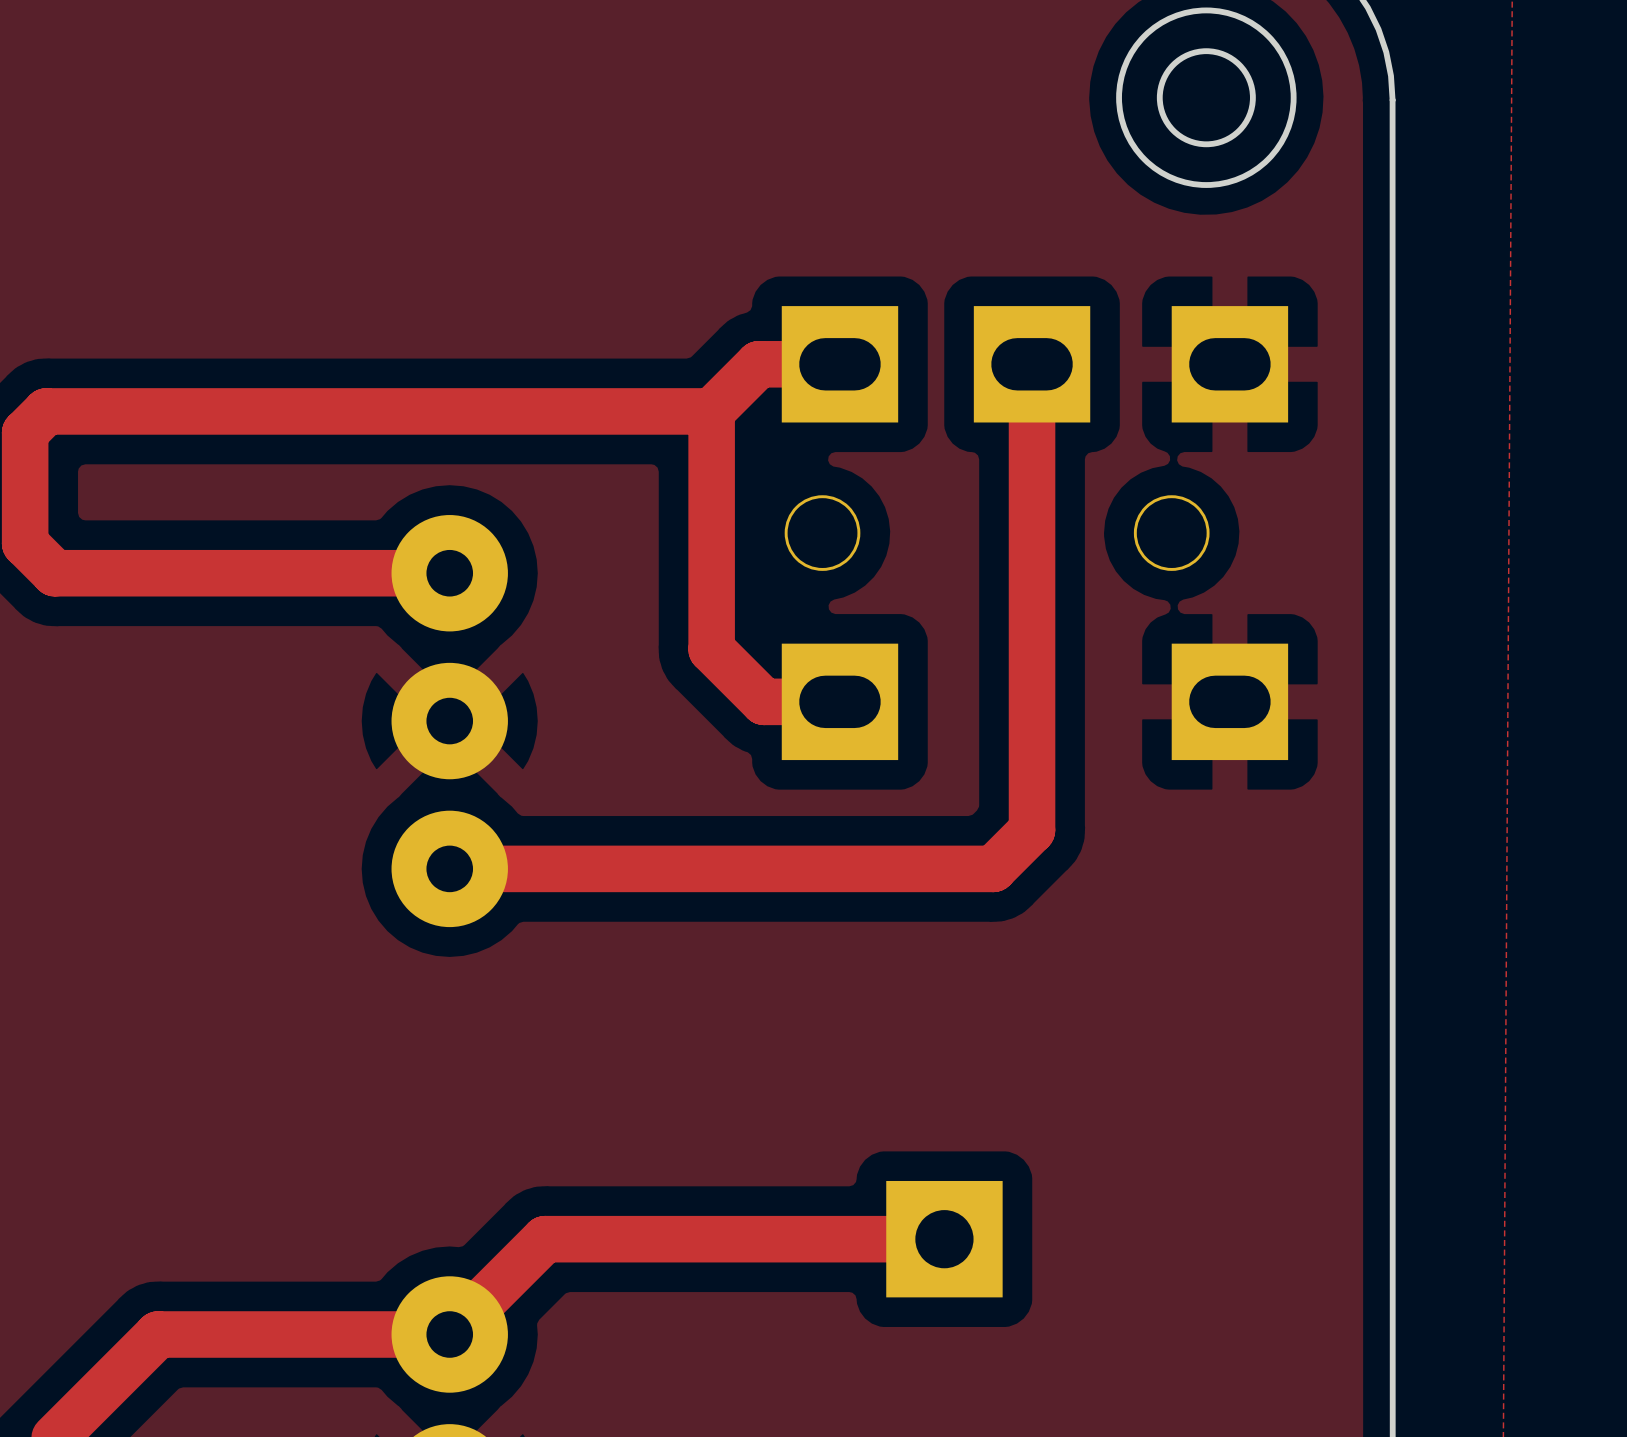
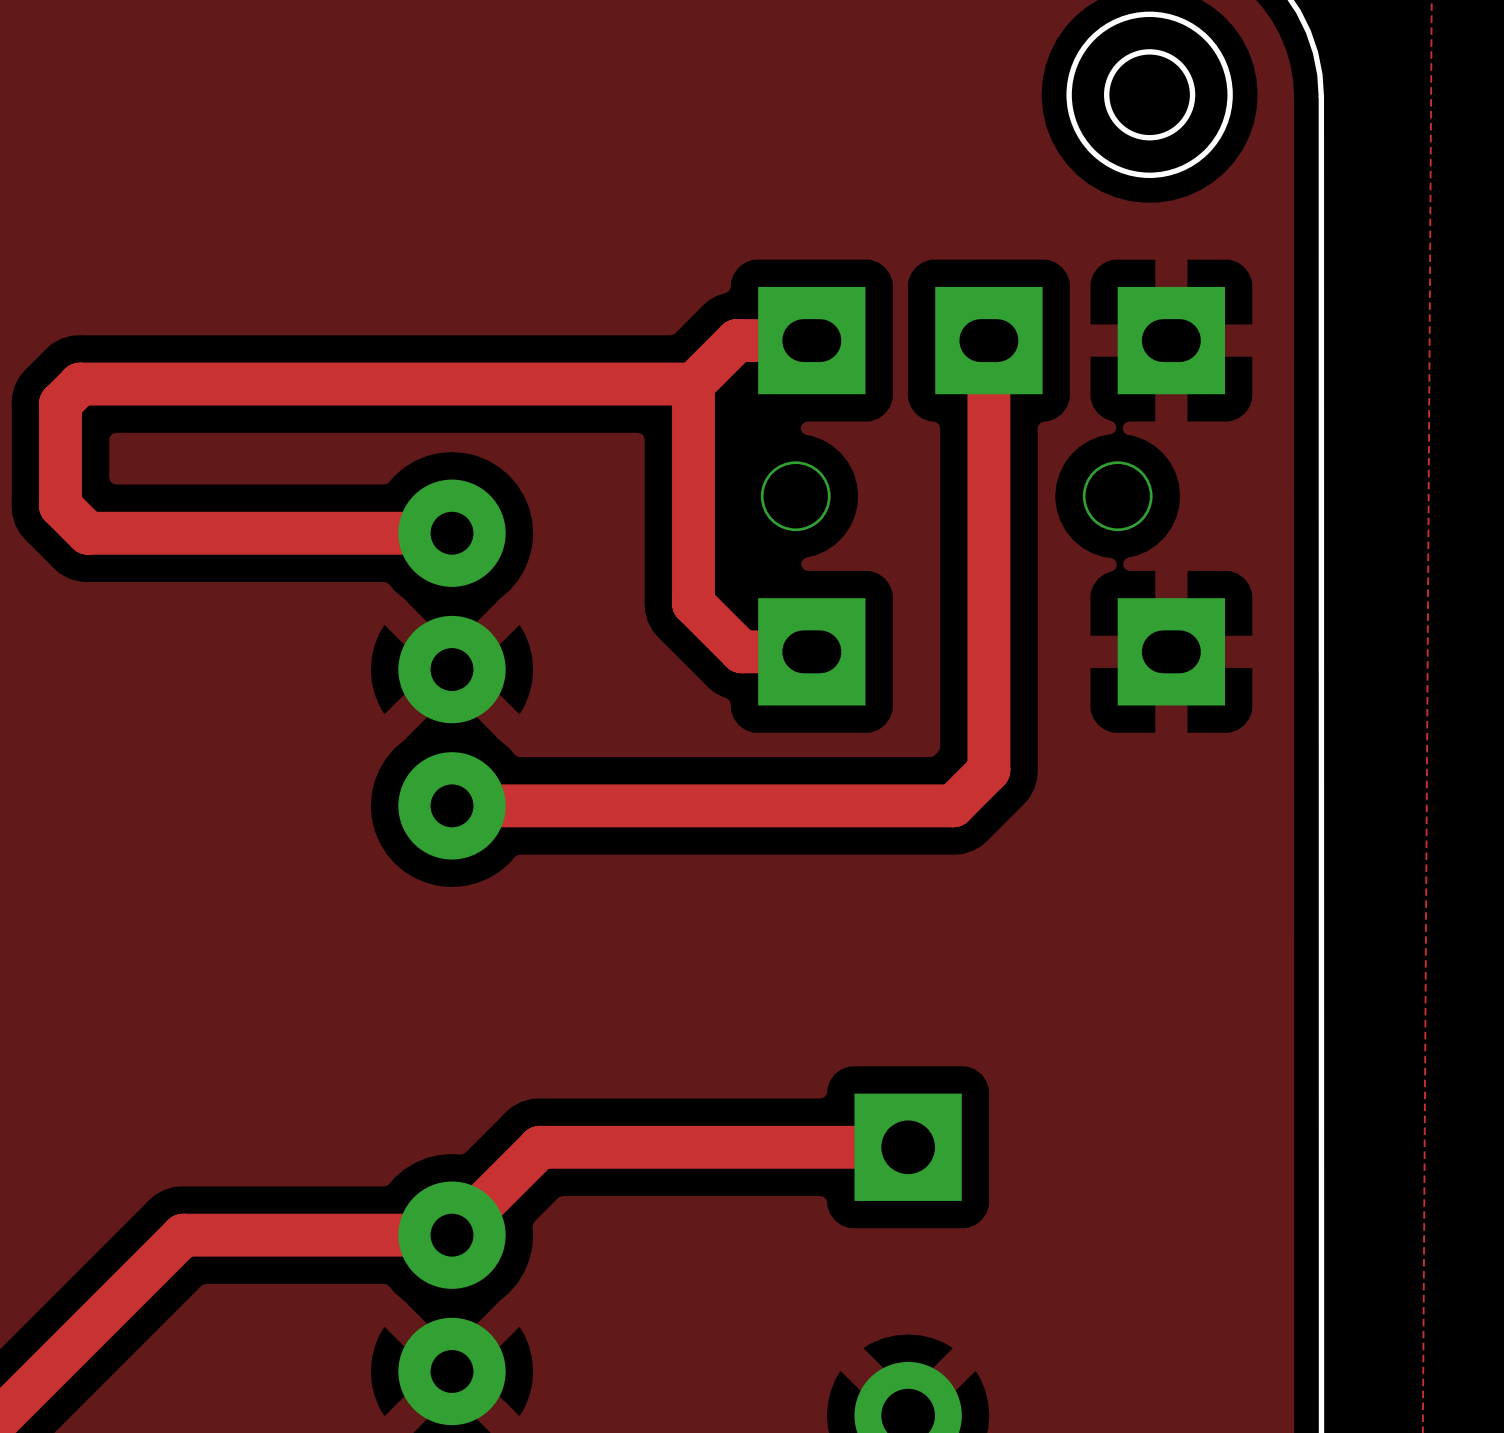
part footprint: [781, 306, 1289, 761] -> [758, 286, 1226, 706]

